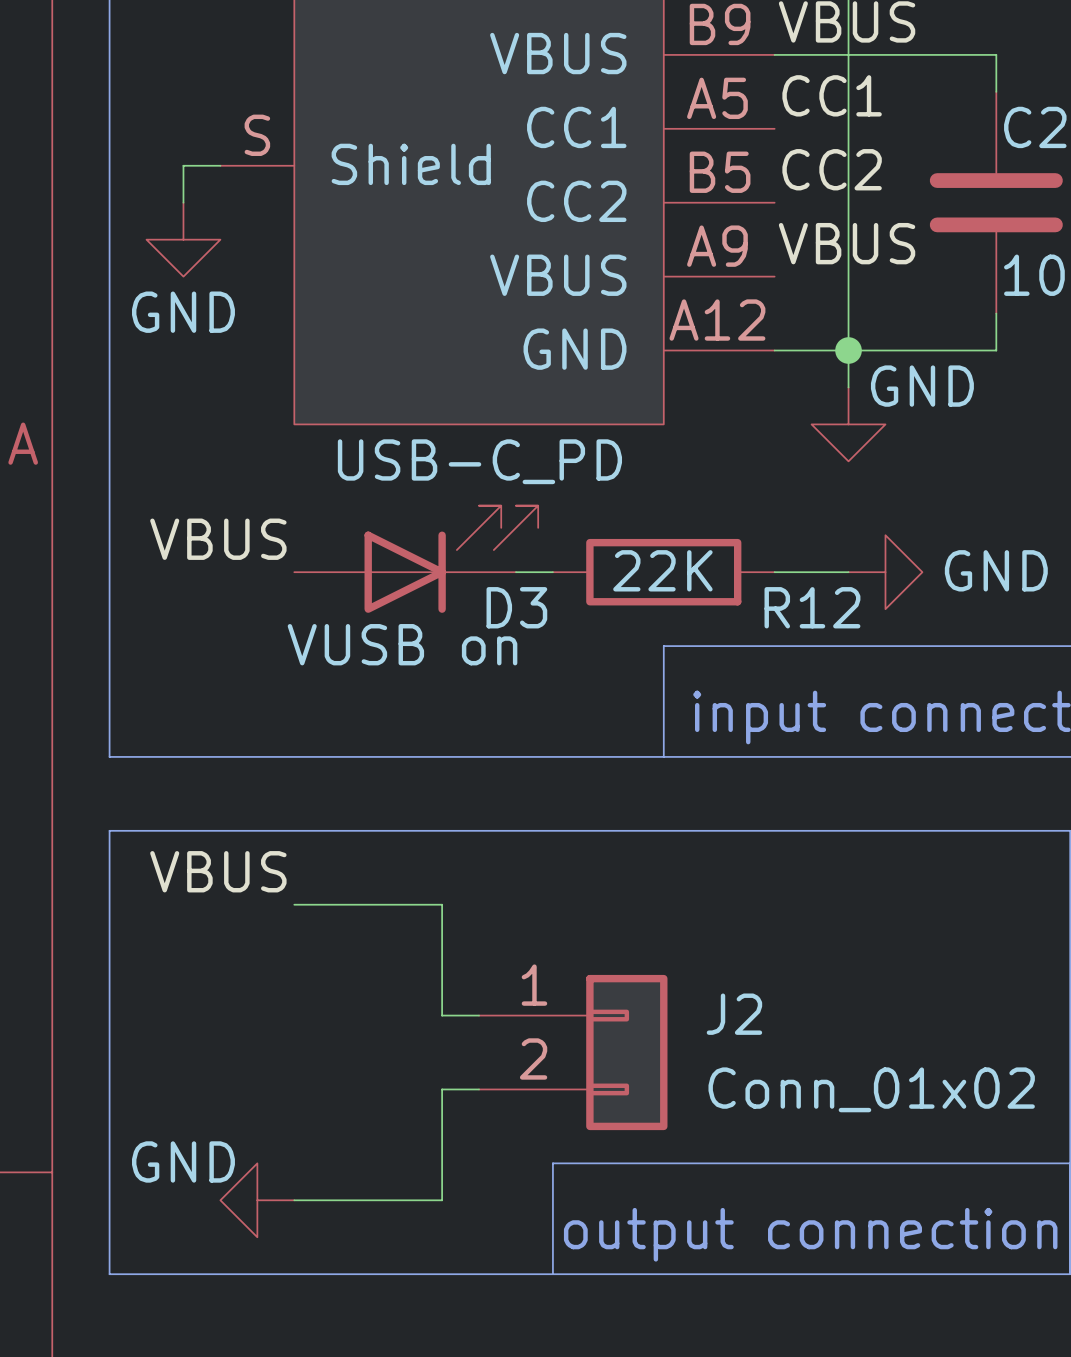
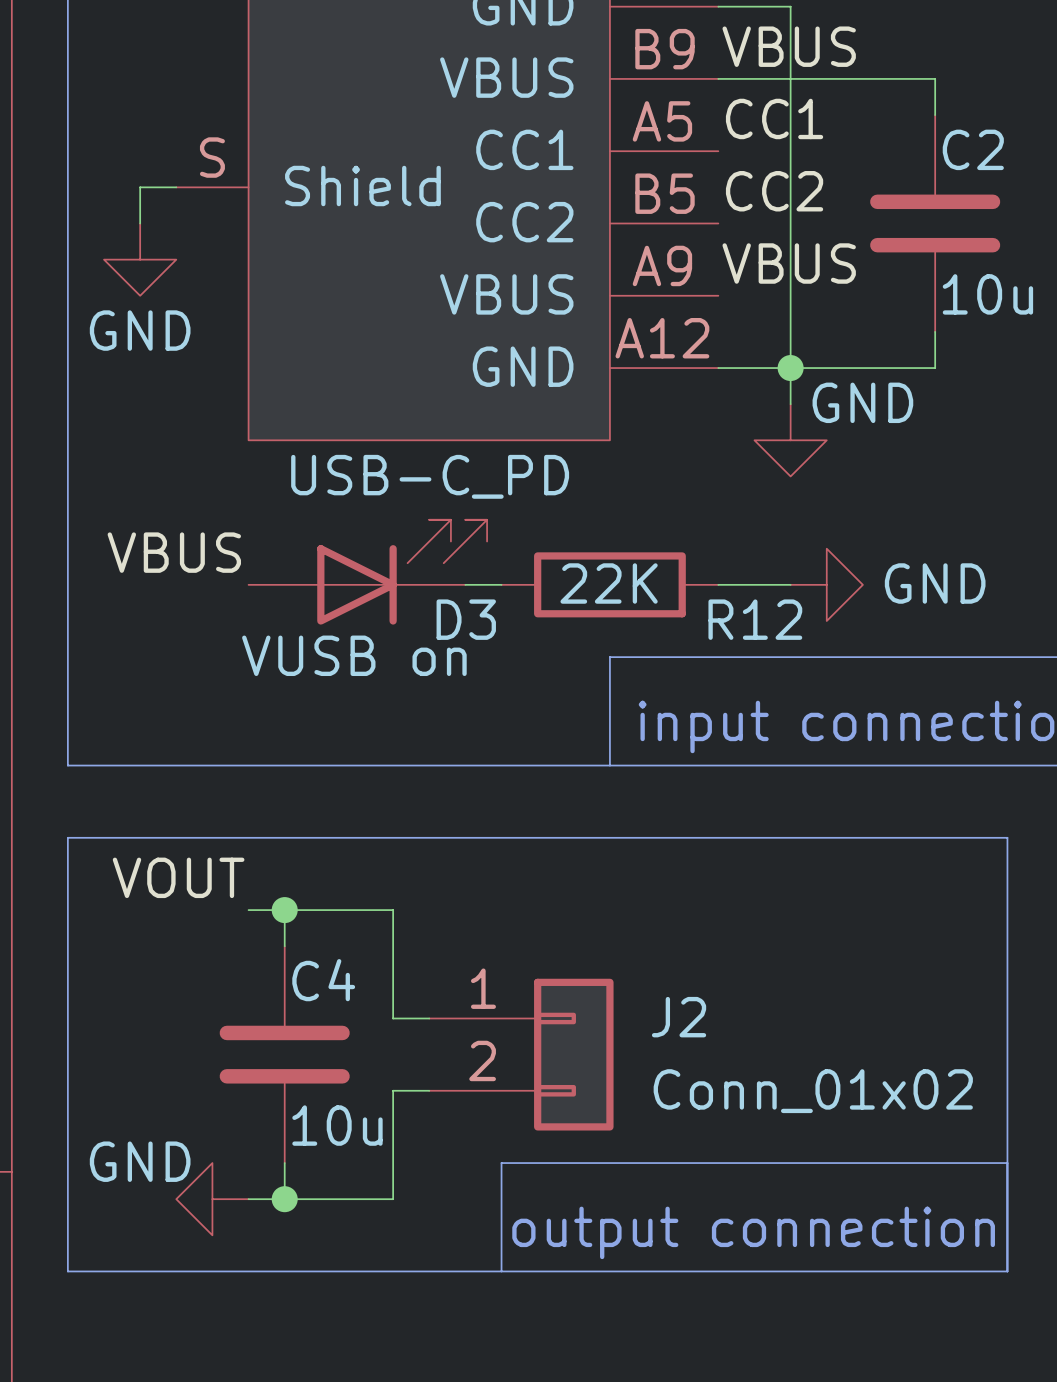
label: VBUS (218, 871) -> VOUT (178, 877)
wire: none -> (284, 910) (284, 946)
junction: none -> (284, 910)
C4: none -> 10u (284, 1054)
wire: none -> (284, 1163) (284, 1199)
junction: none -> (284, 1199)

